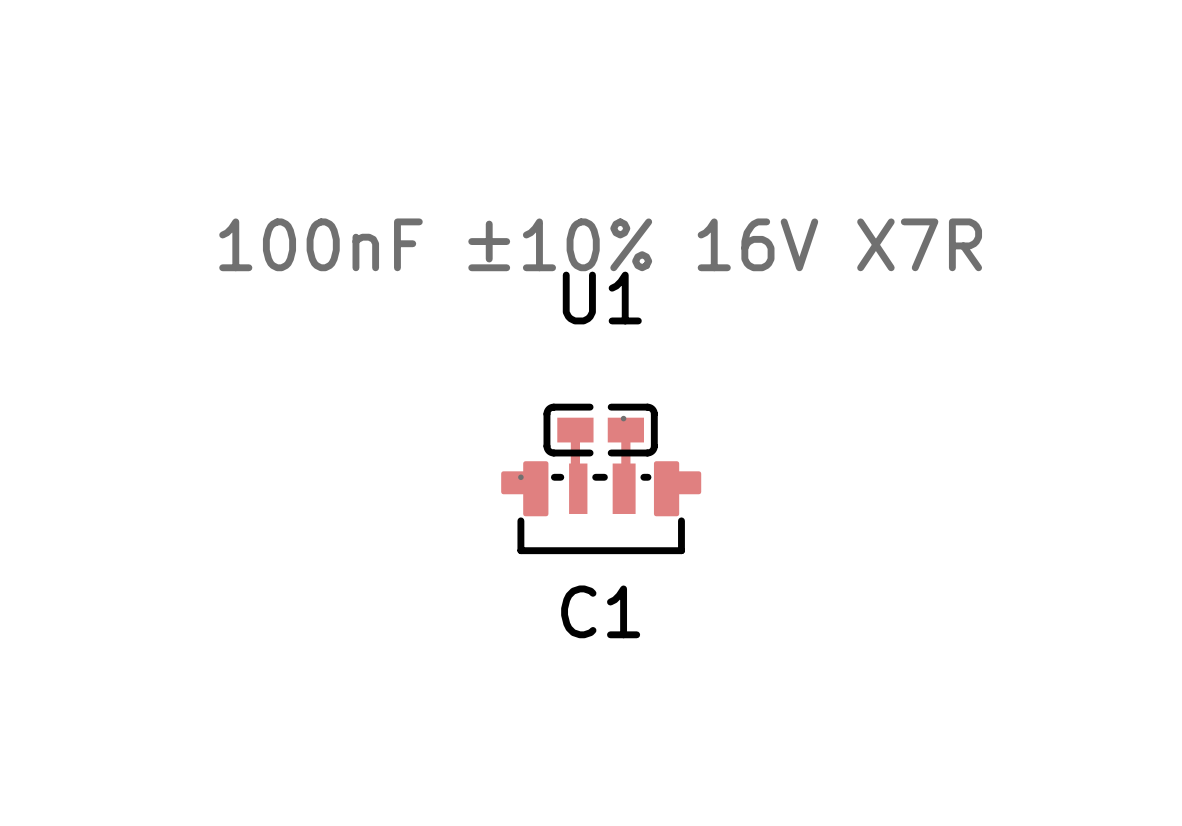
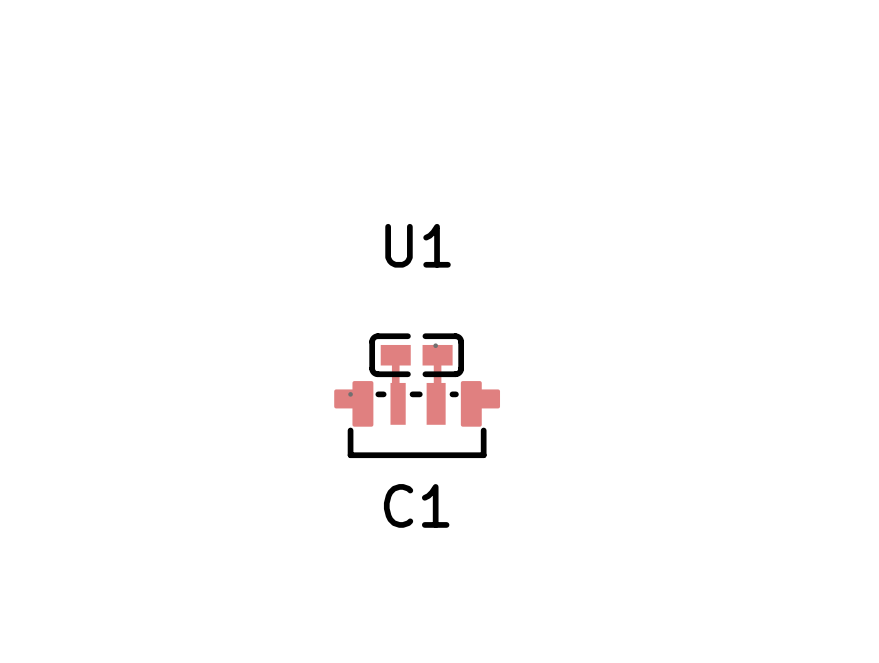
C1 value: 100nF ±10% 16V X7R (600, 244) -> none

